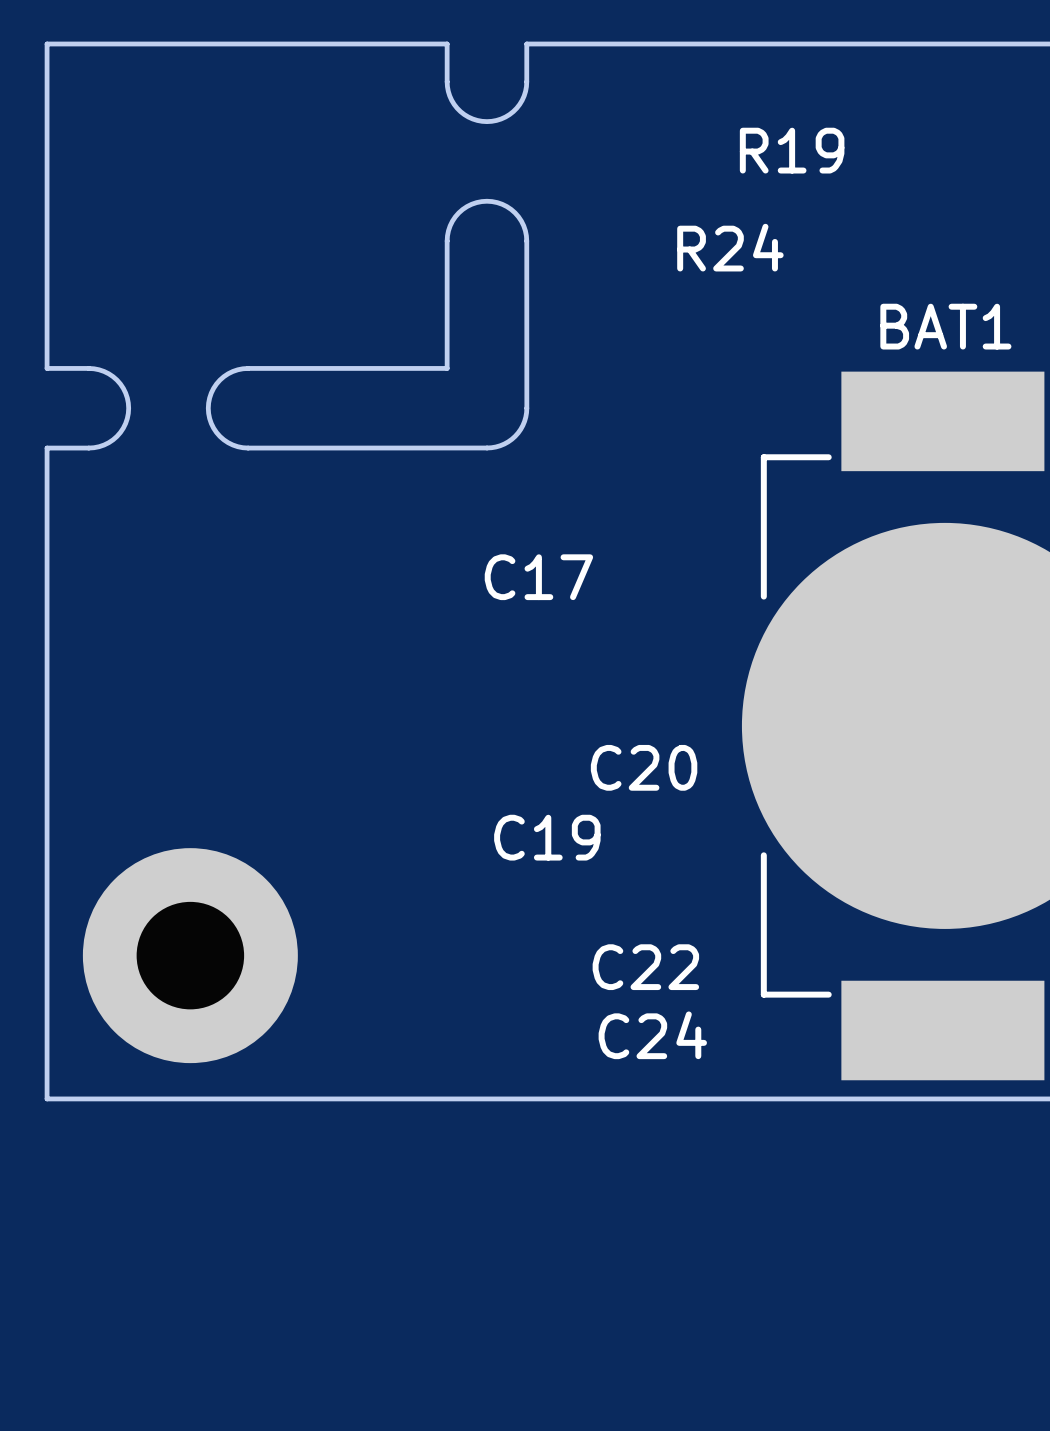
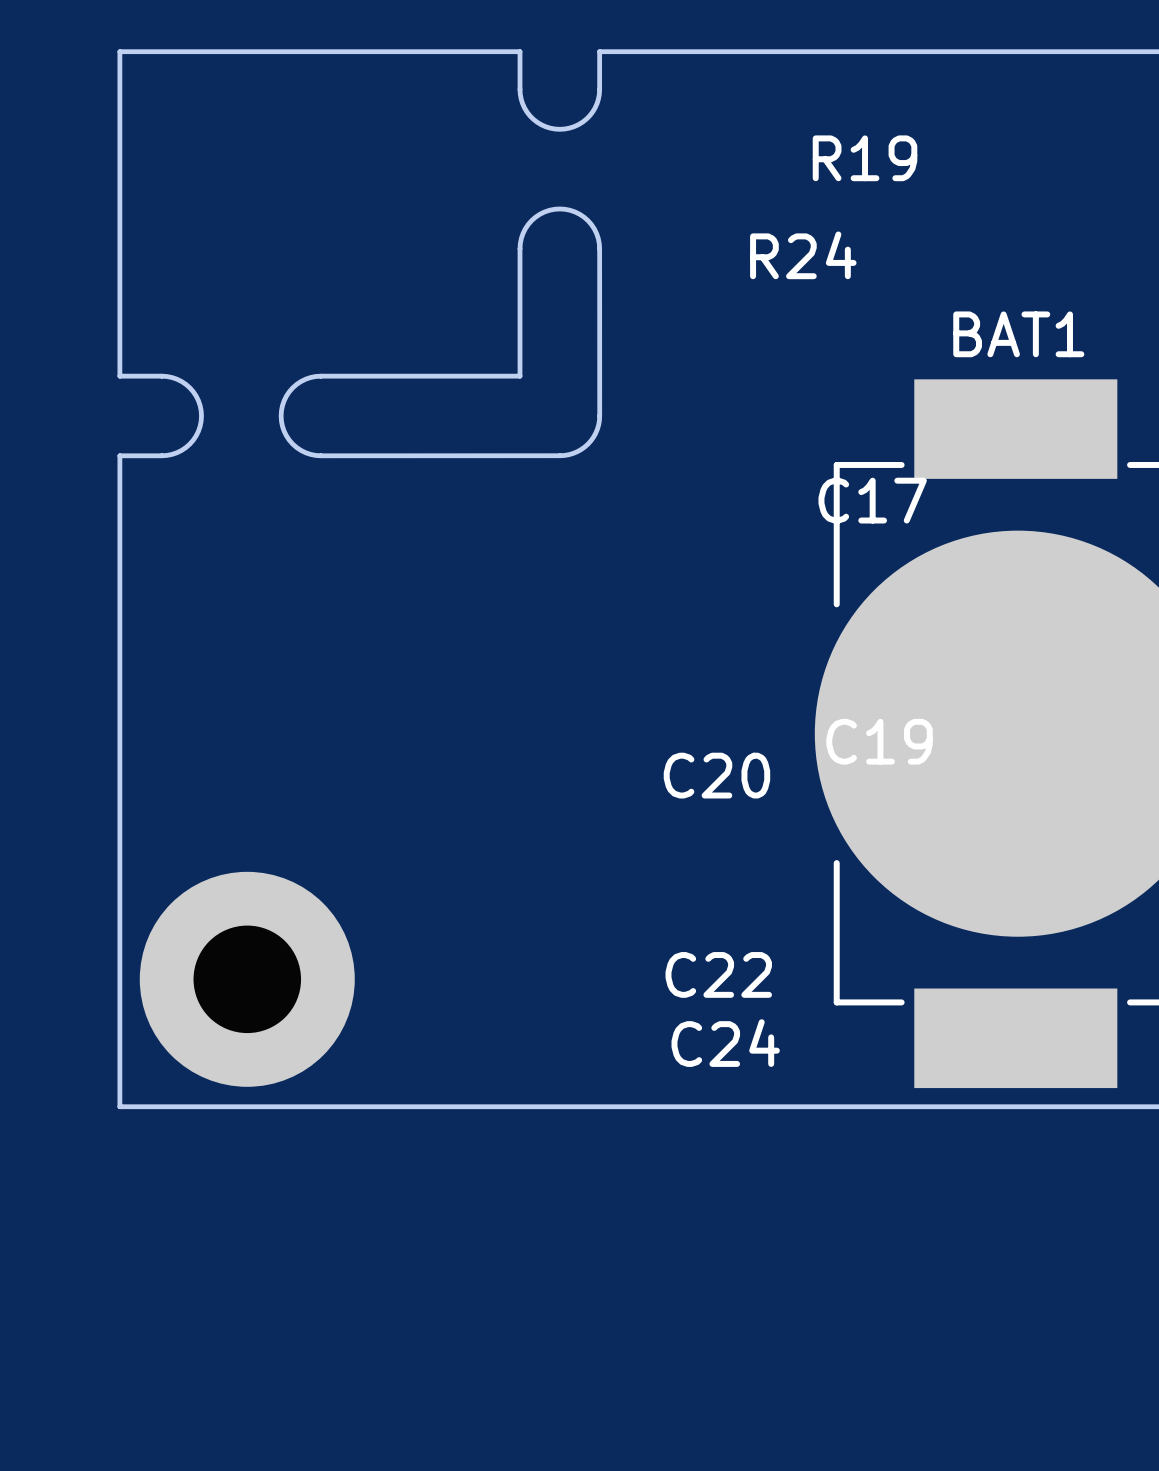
C17 position: (538, 577) -> (872, 500)
C19 position: (547, 837) -> (879, 741)
part position: (190, 955) -> (247, 979)

